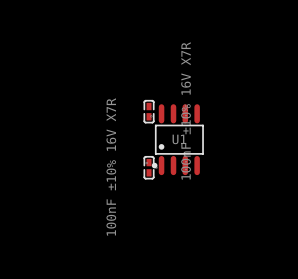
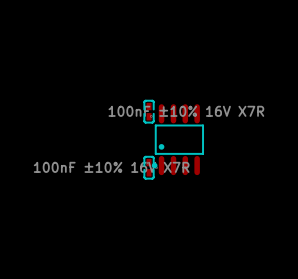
part value rotation: 0° (186, 110) -> 90° clockwise (186, 111)
U1 name: U1 (179, 139) -> none
part value rotation: 0° (111, 166) -> 90° clockwise (111, 167)

